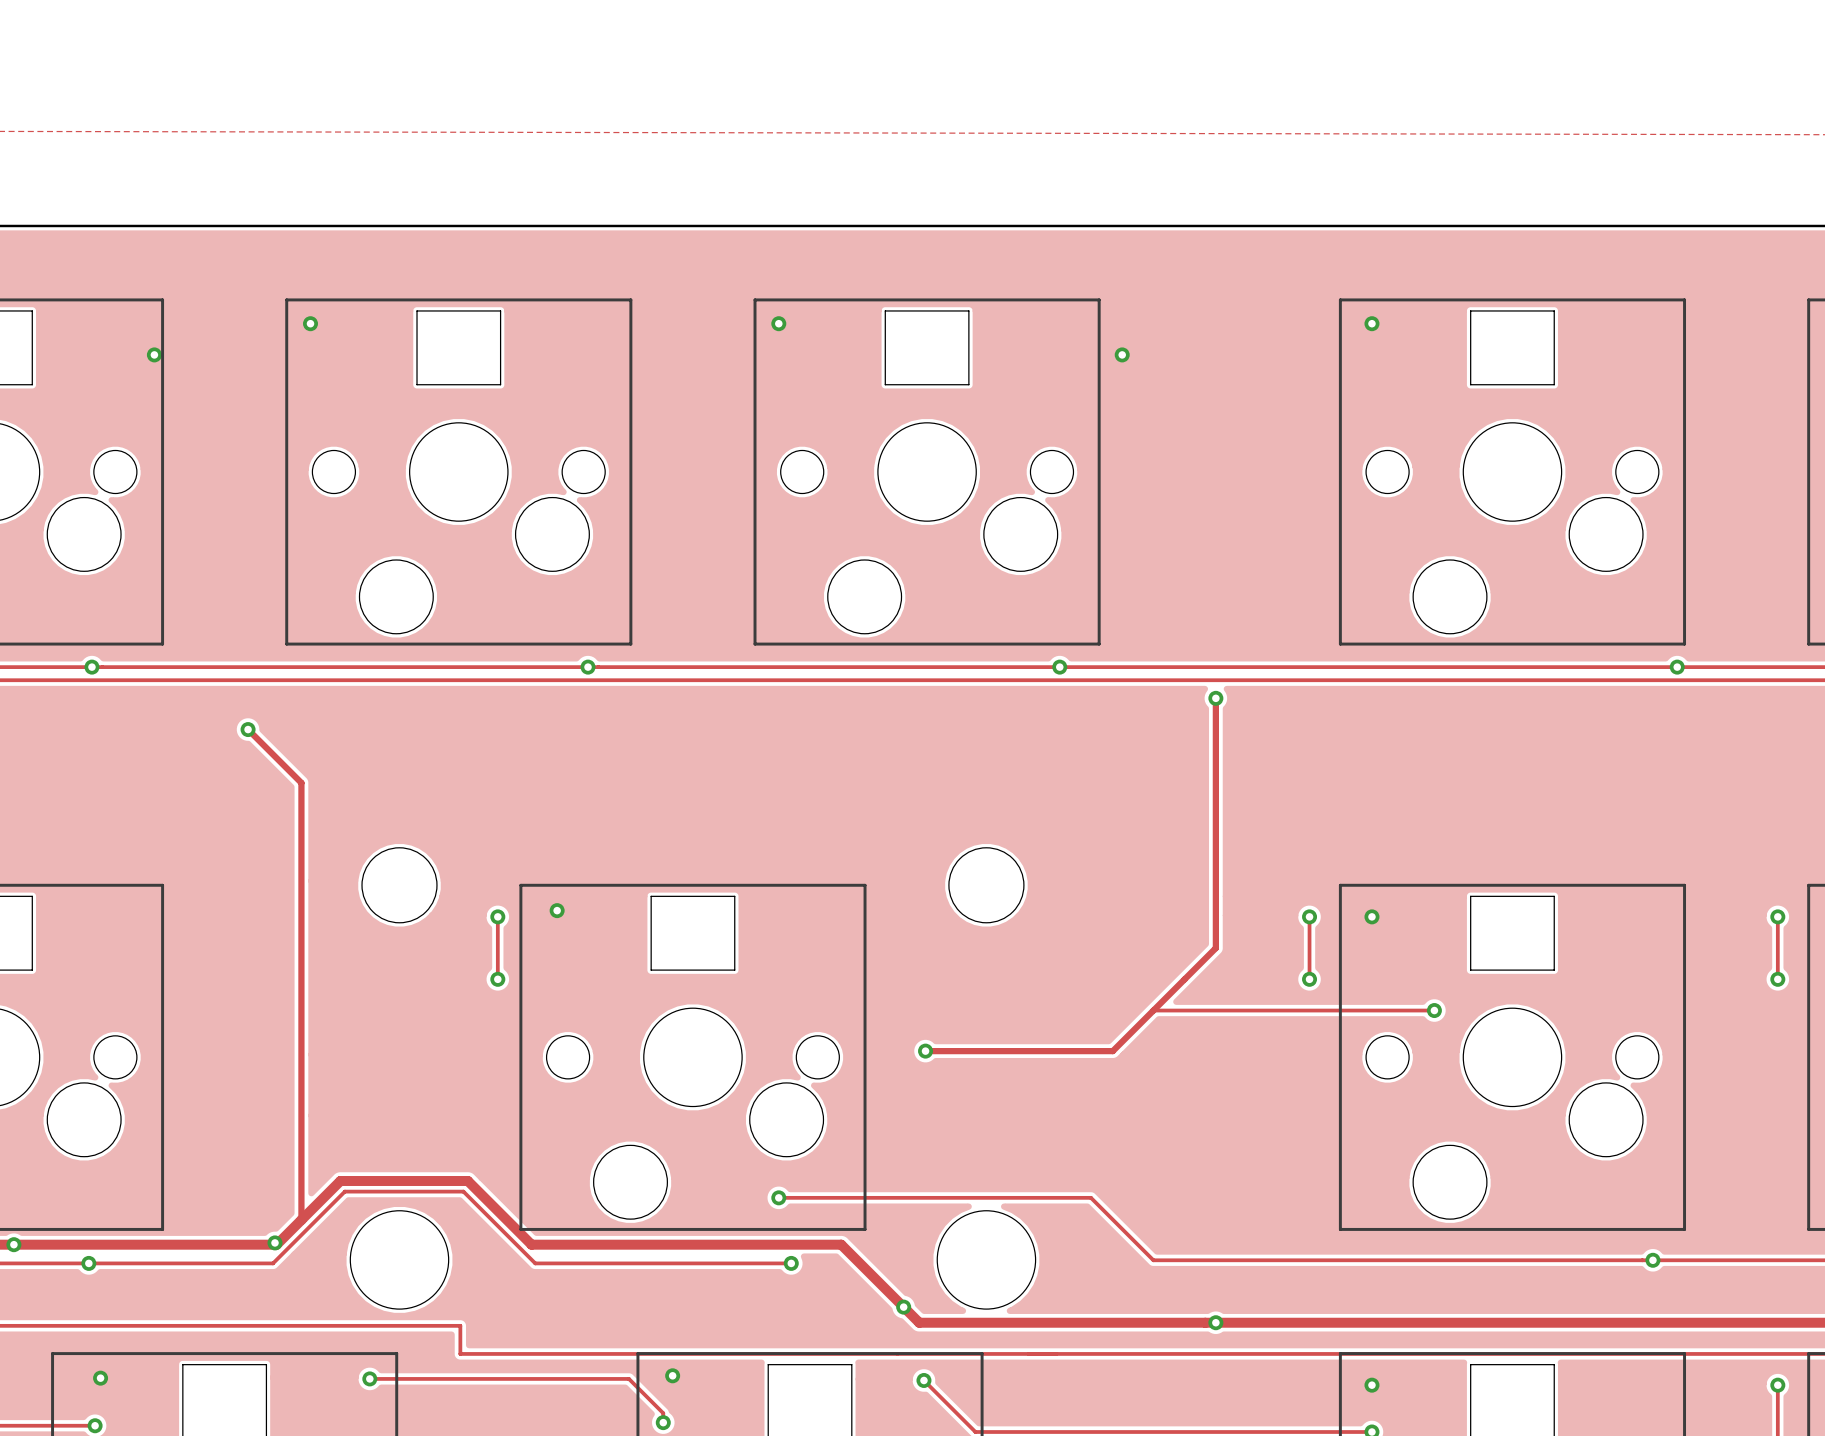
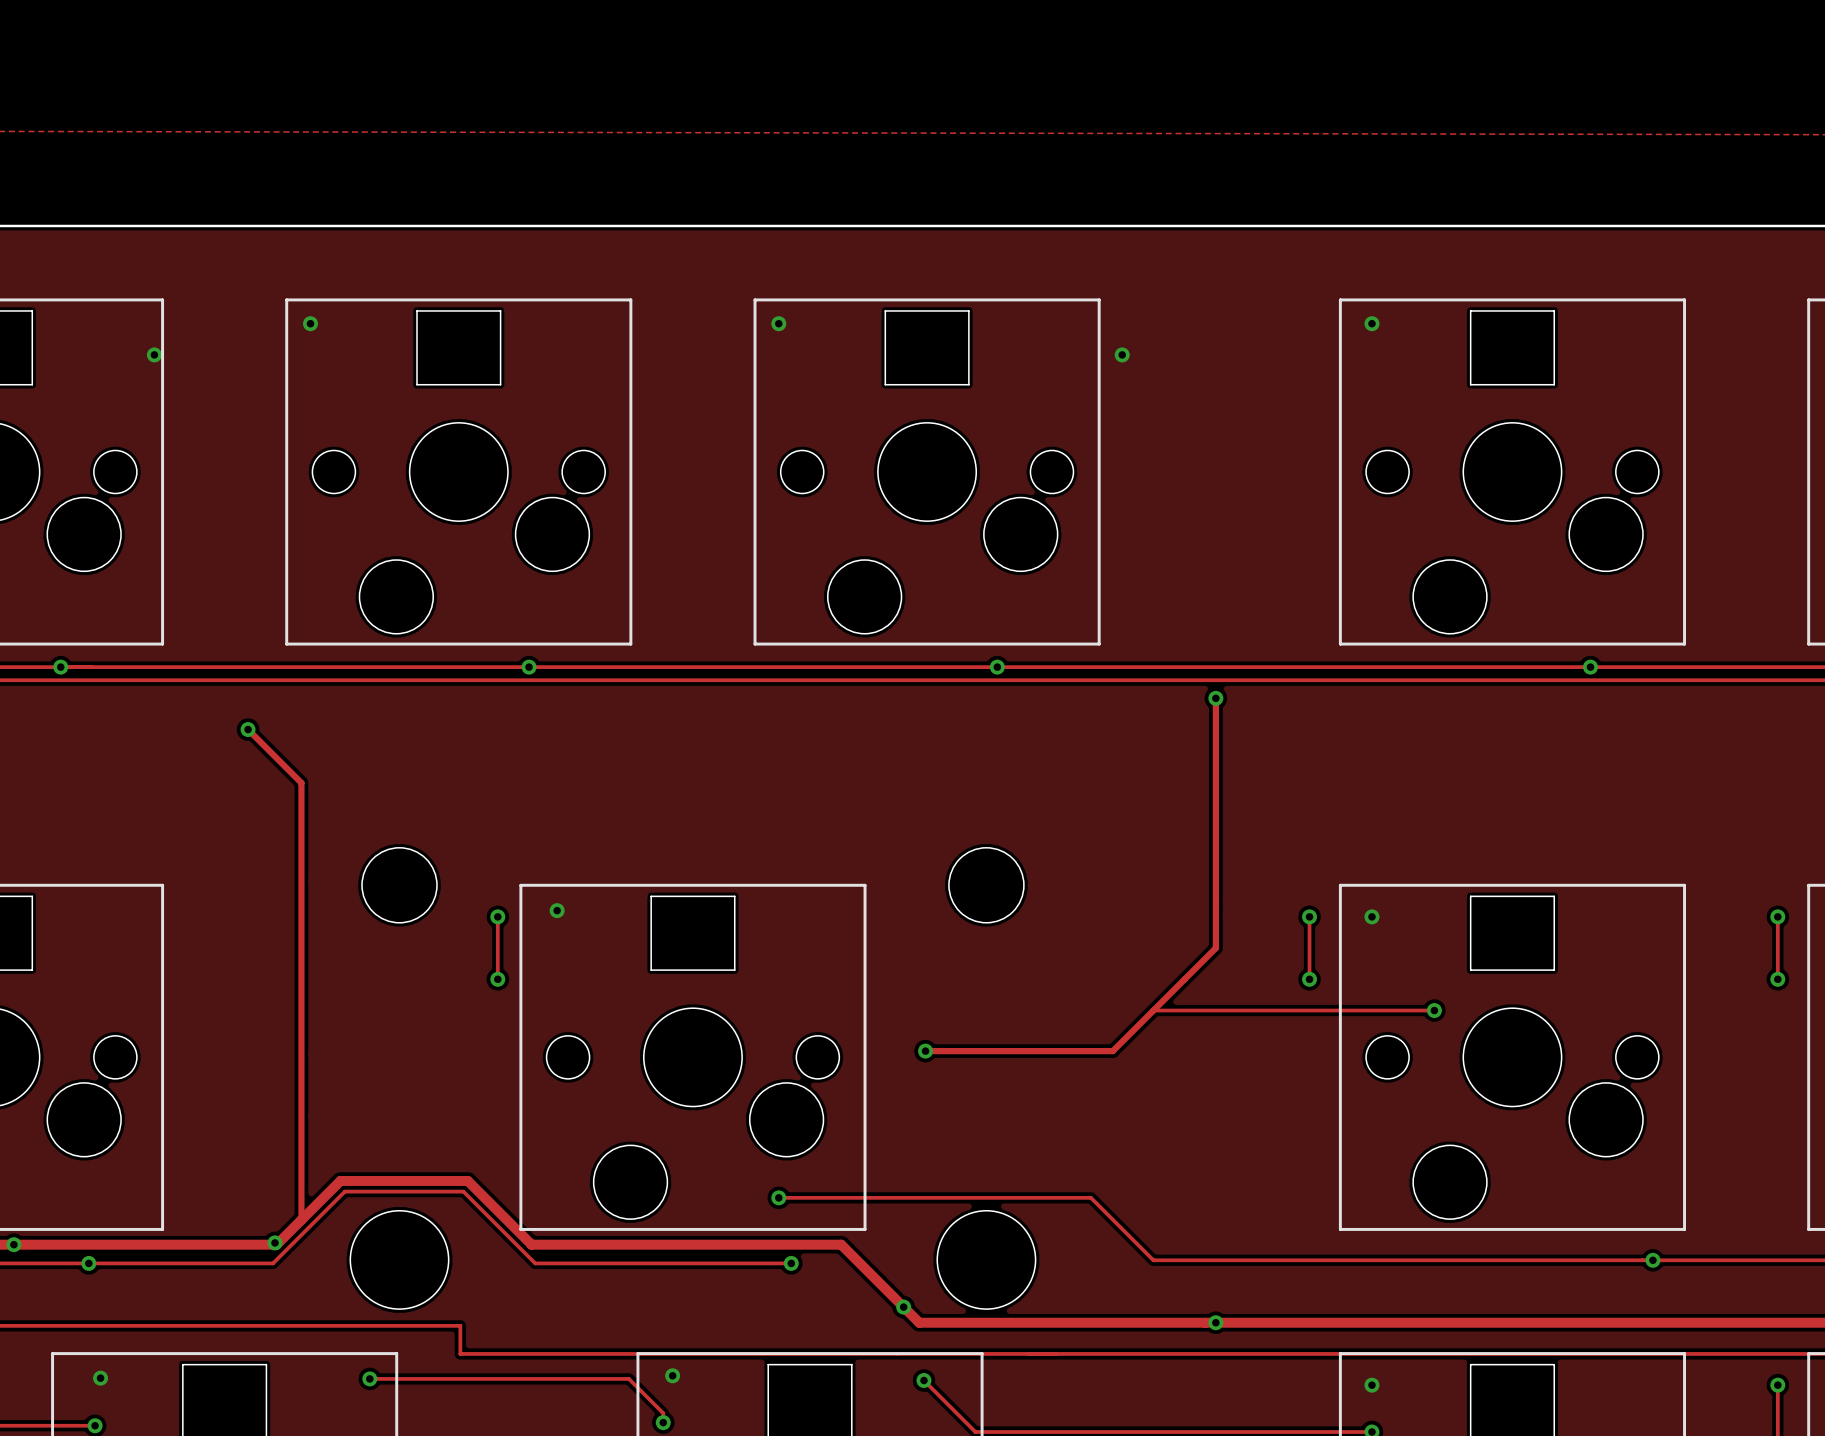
via position: (91, 667) -> (60, 667)
via position: (588, 667) -> (529, 667)
via position: (1059, 667) -> (997, 667)
via position: (1677, 667) -> (1590, 667)

